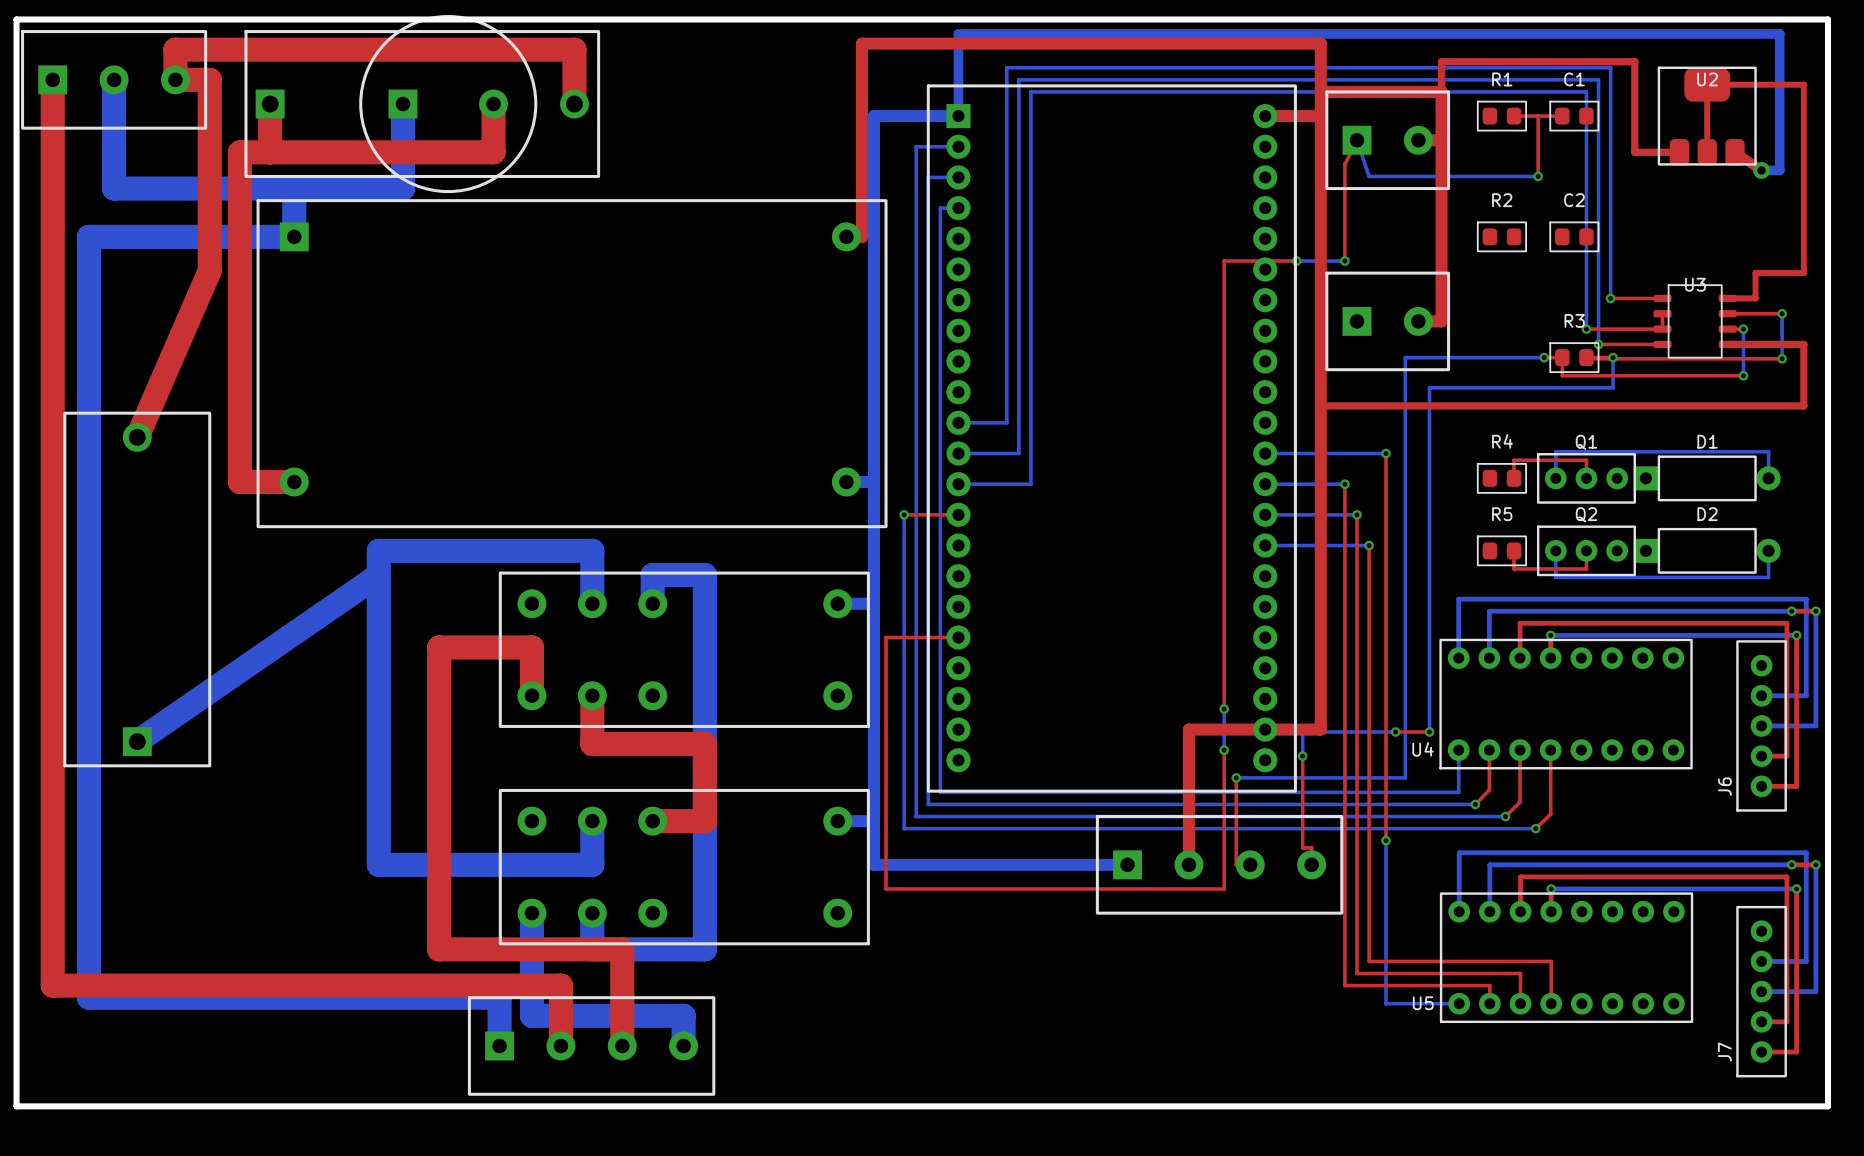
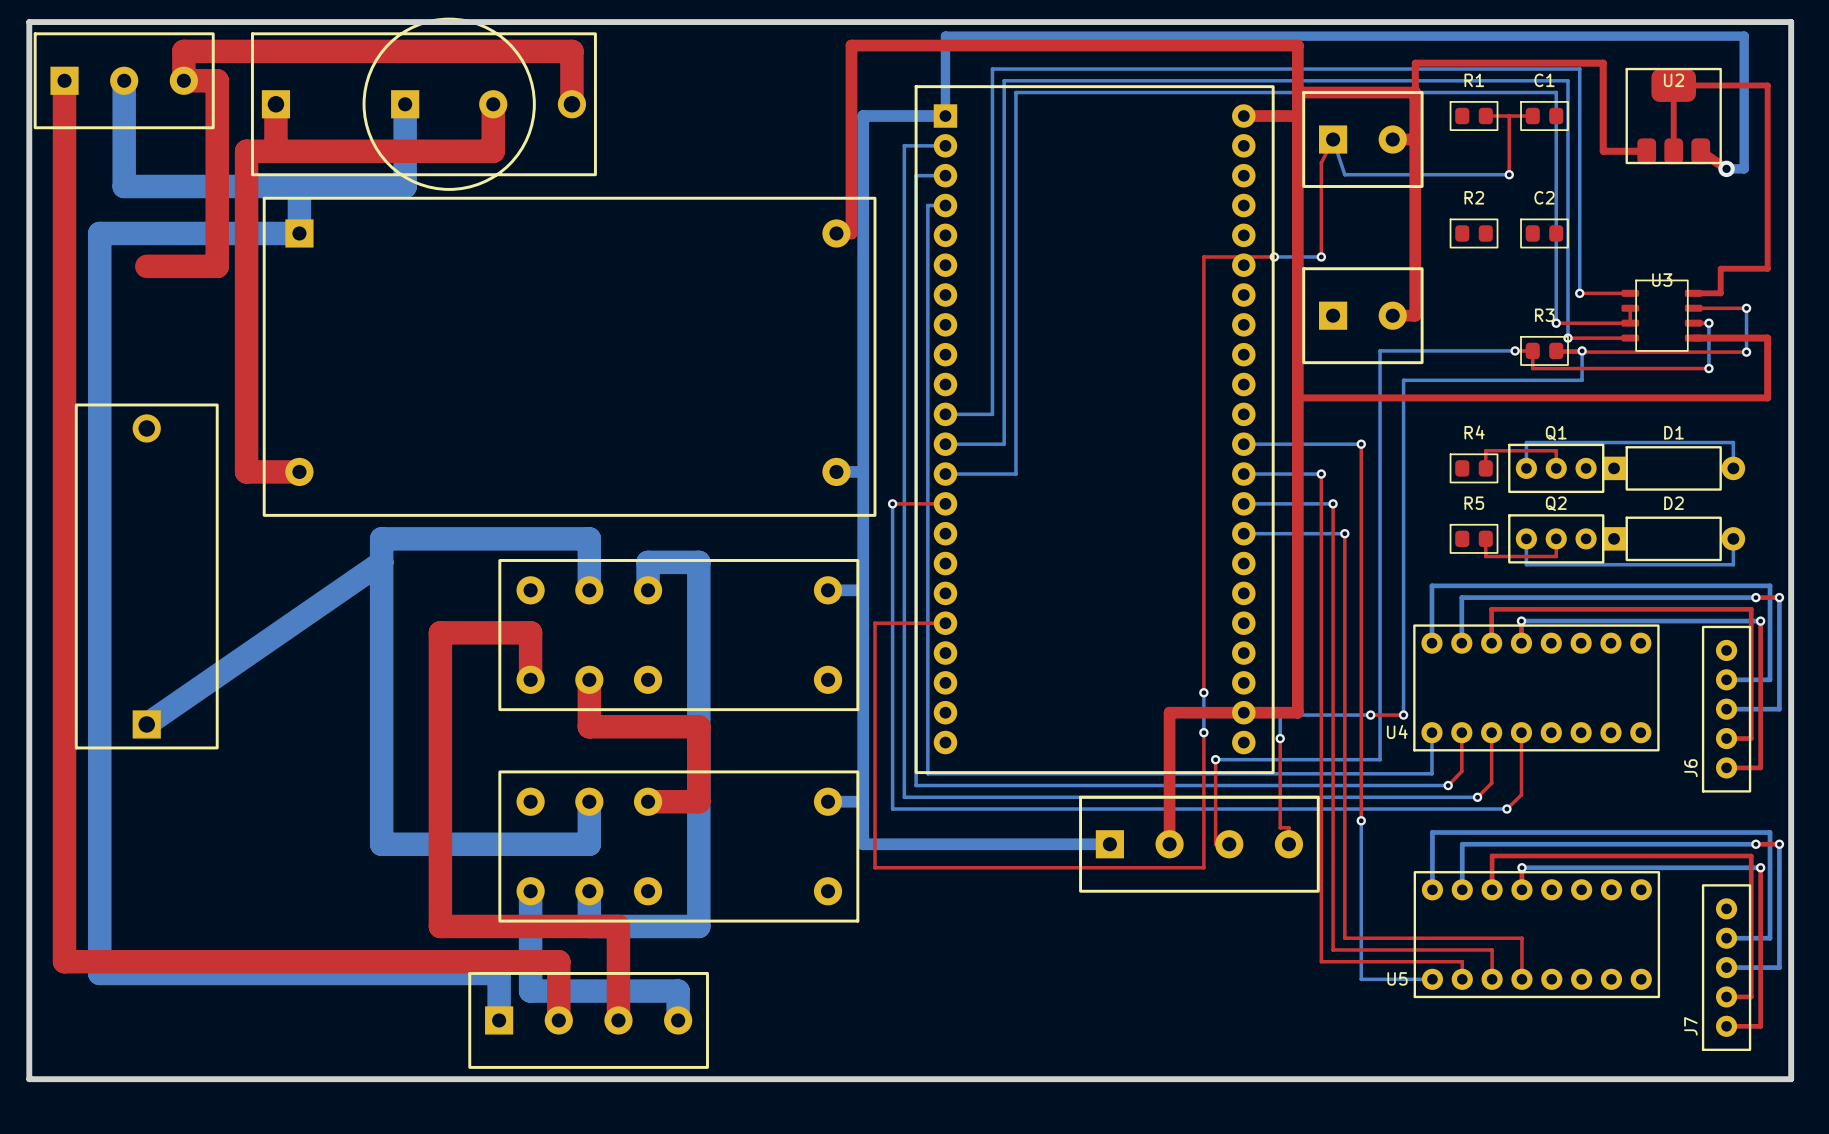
top track: (209, 270) (137, 437) -> (217, 266) (146, 266)

